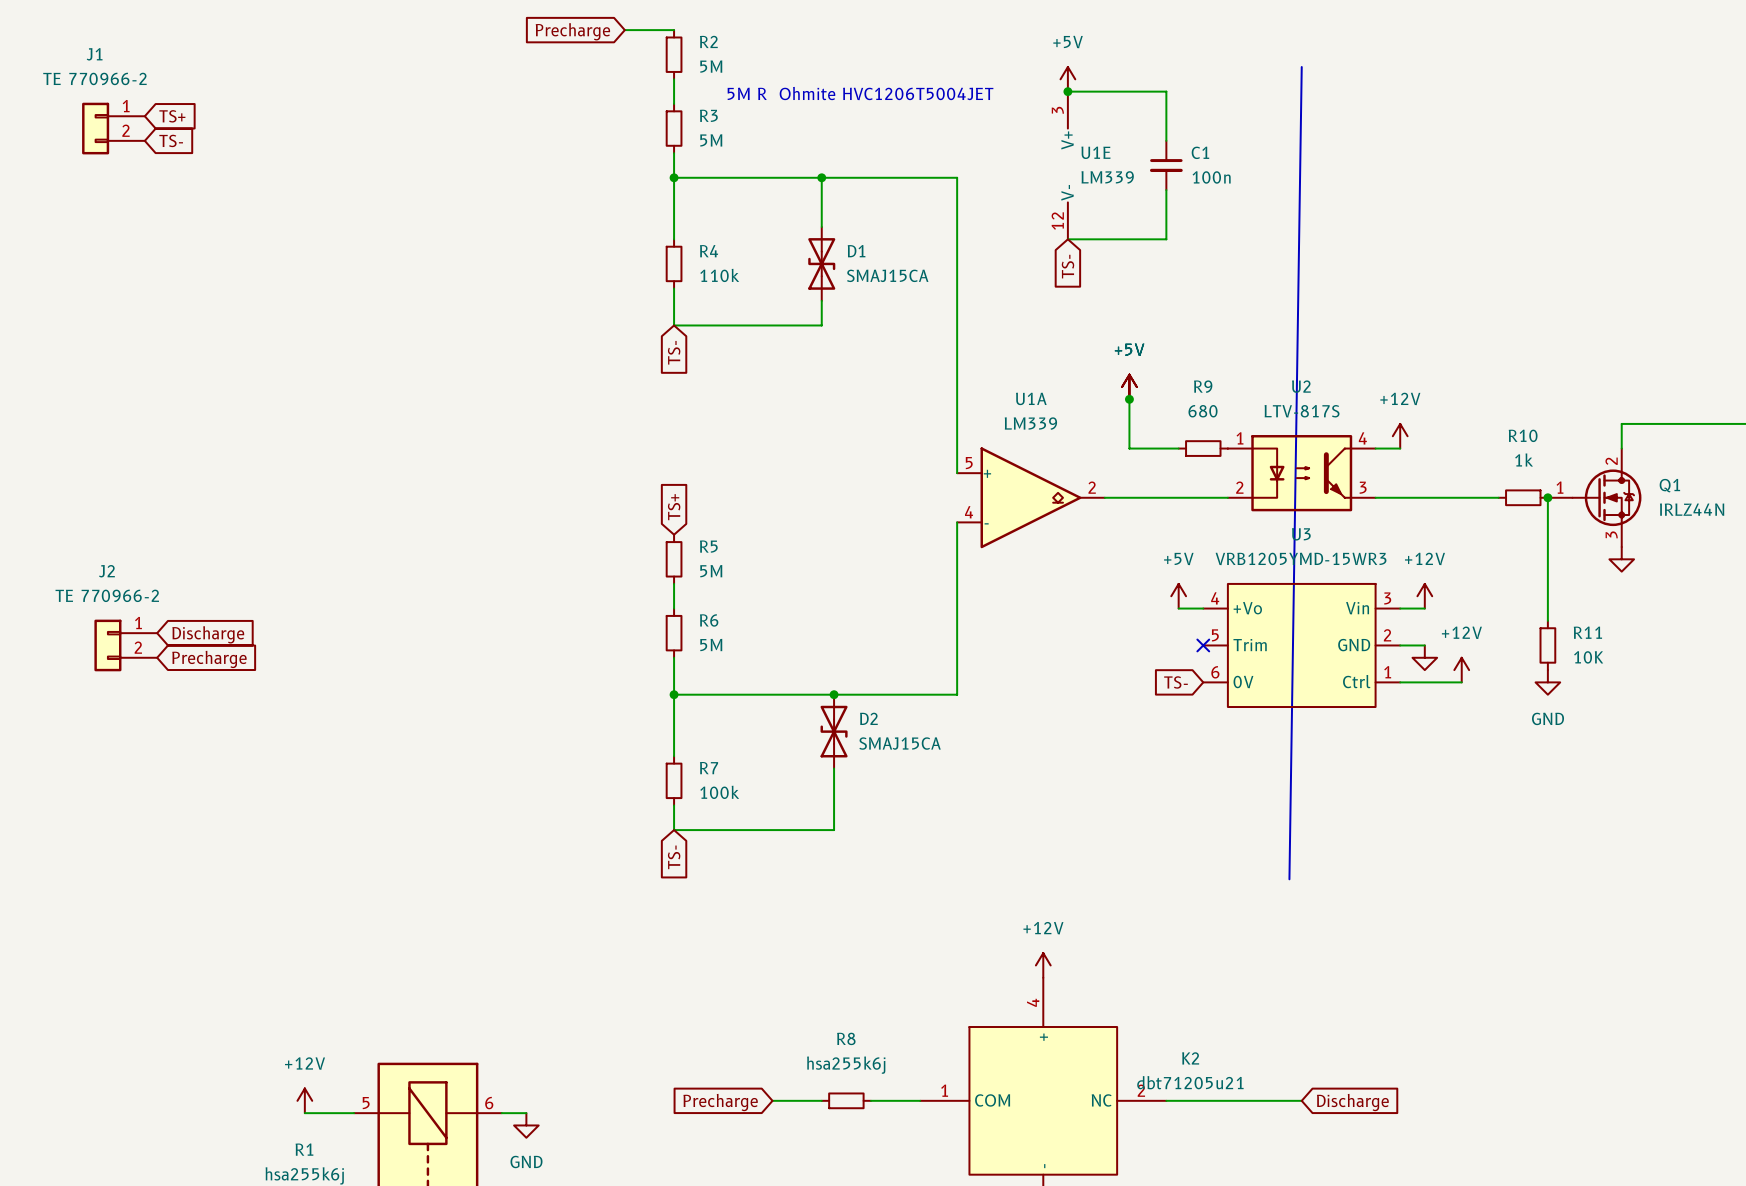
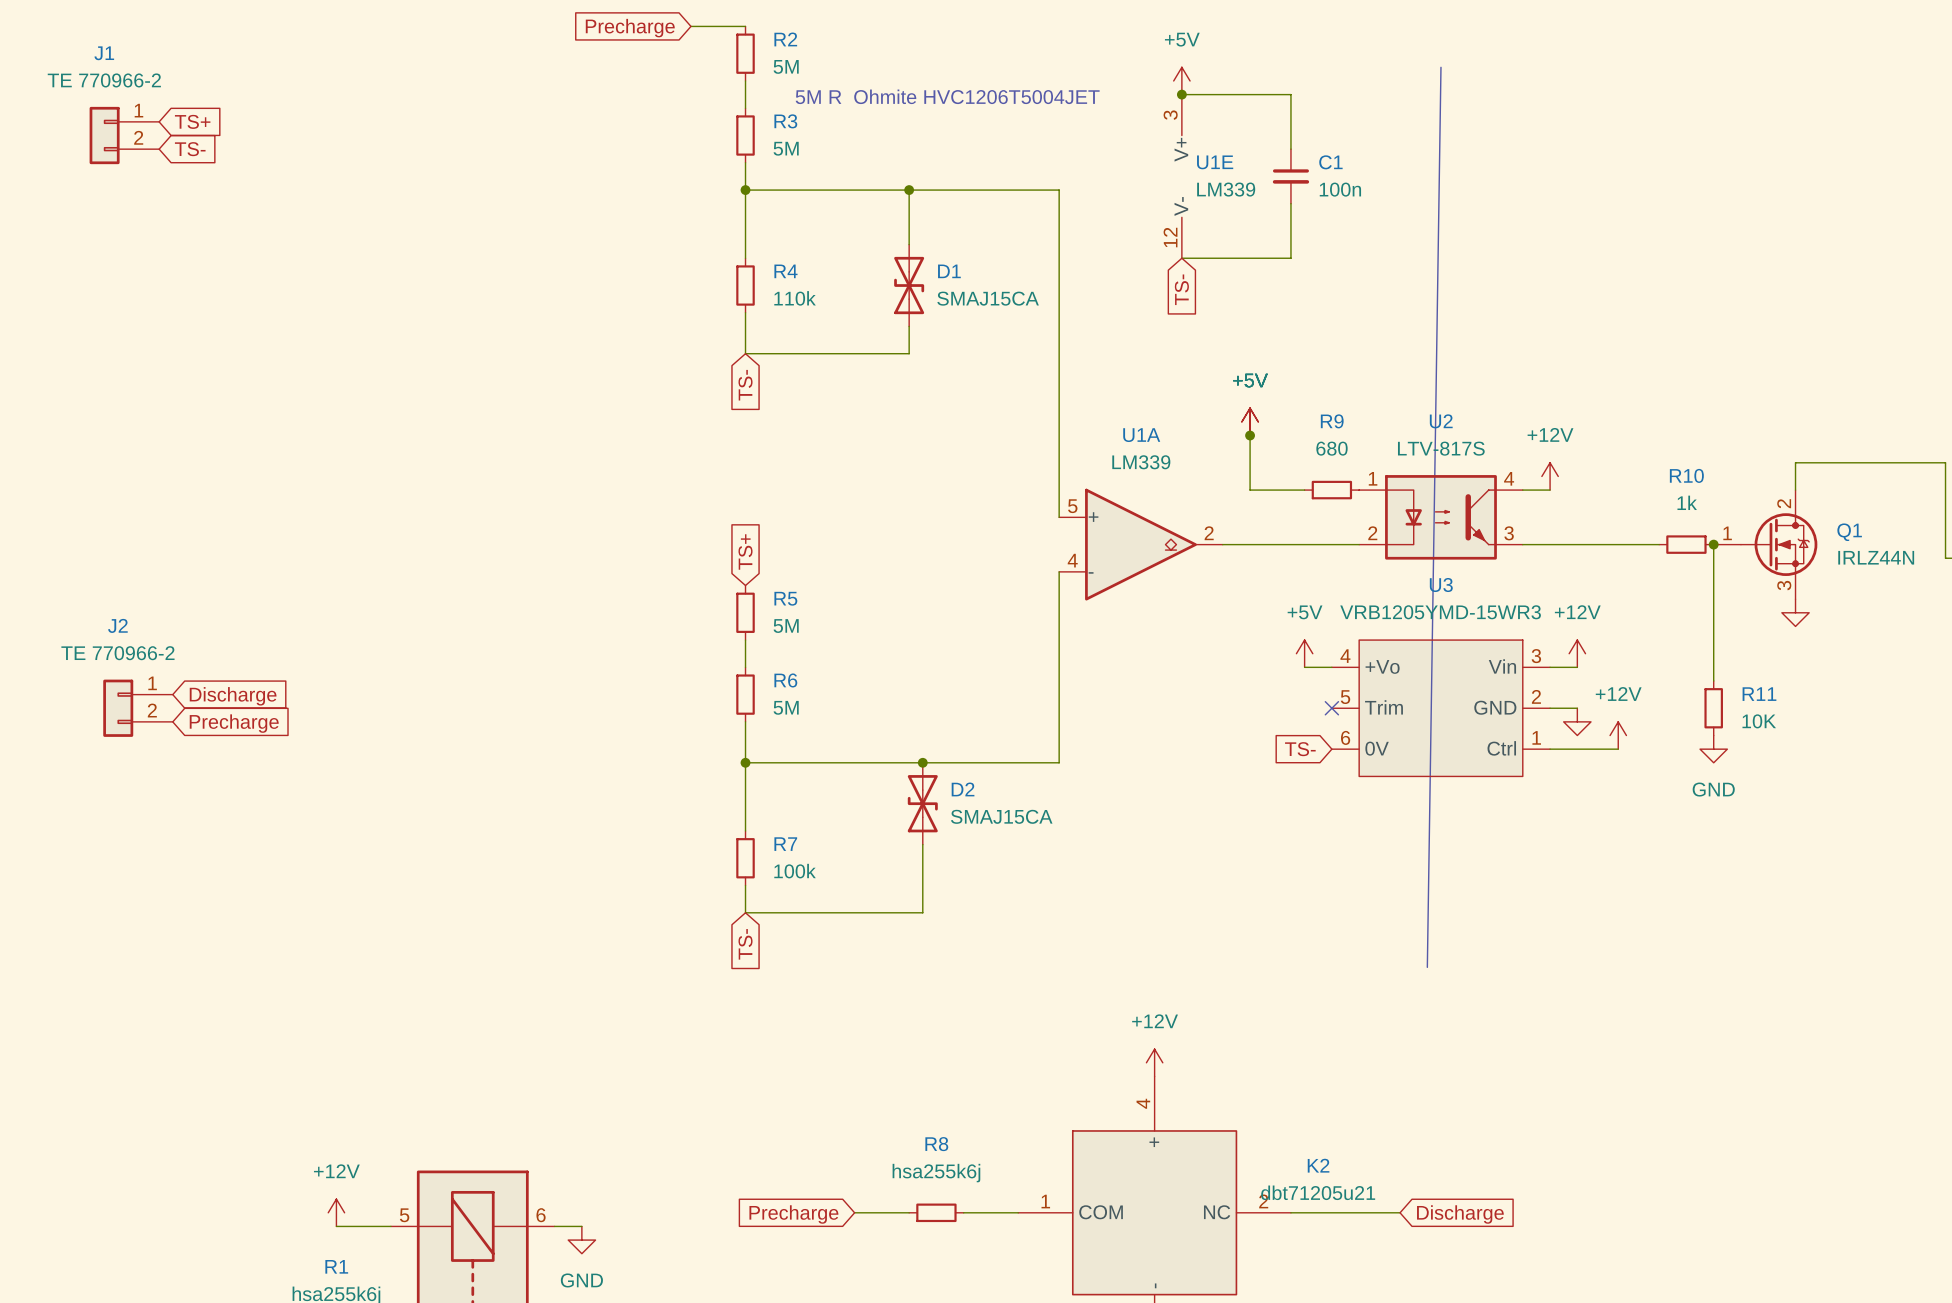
wire: (1264, 1100) (1301, 1100) -> none
global label position: Discharge (1352, 1102) -> Discharge (1460, 1214)

